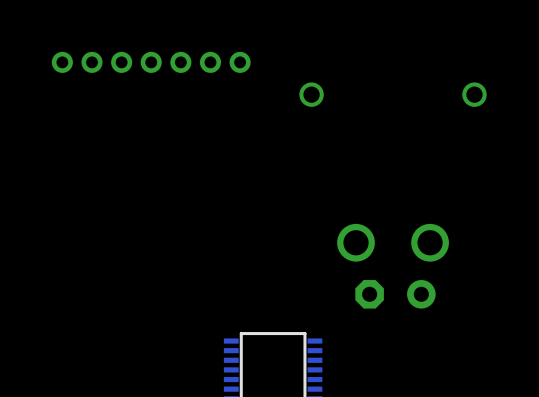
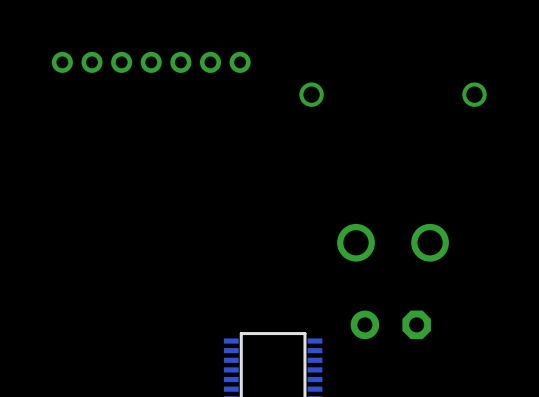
part rotation: 0° (395, 294) -> 180° (390, 324)

